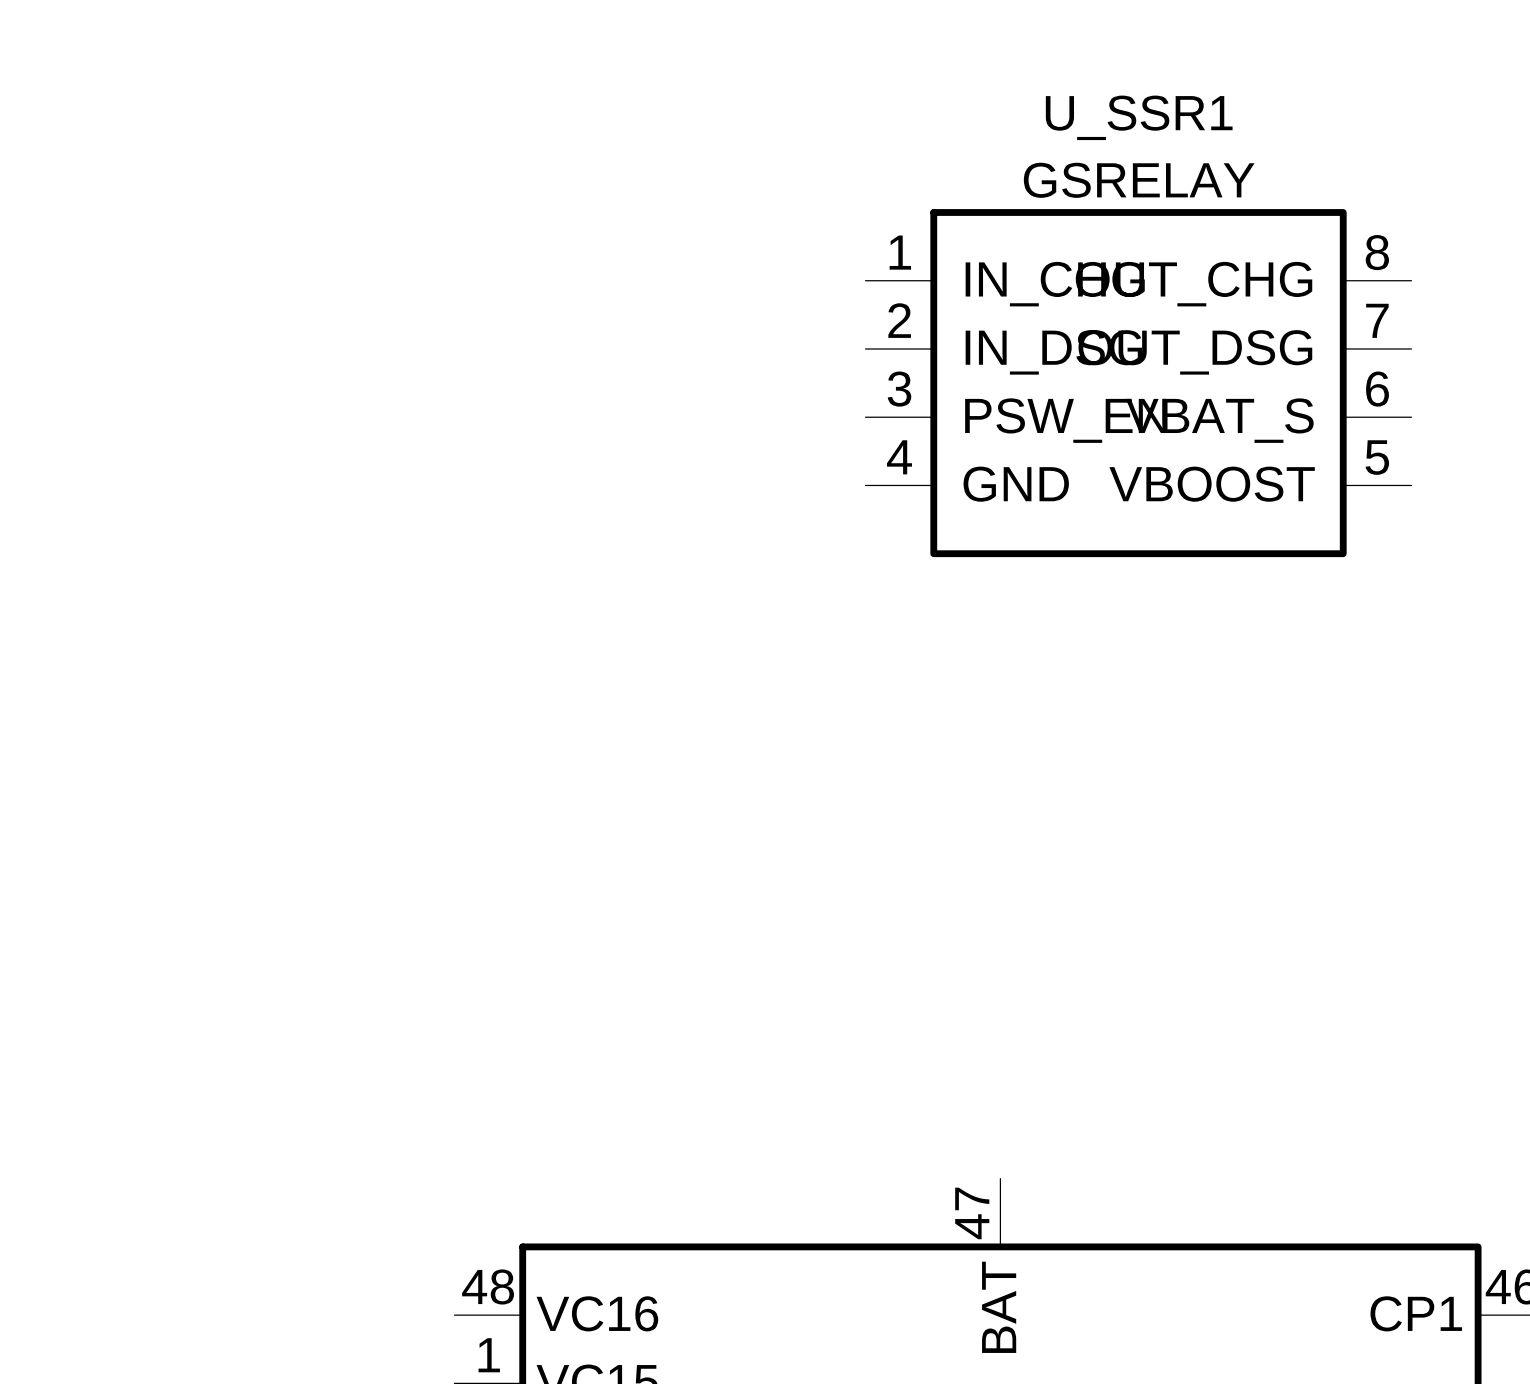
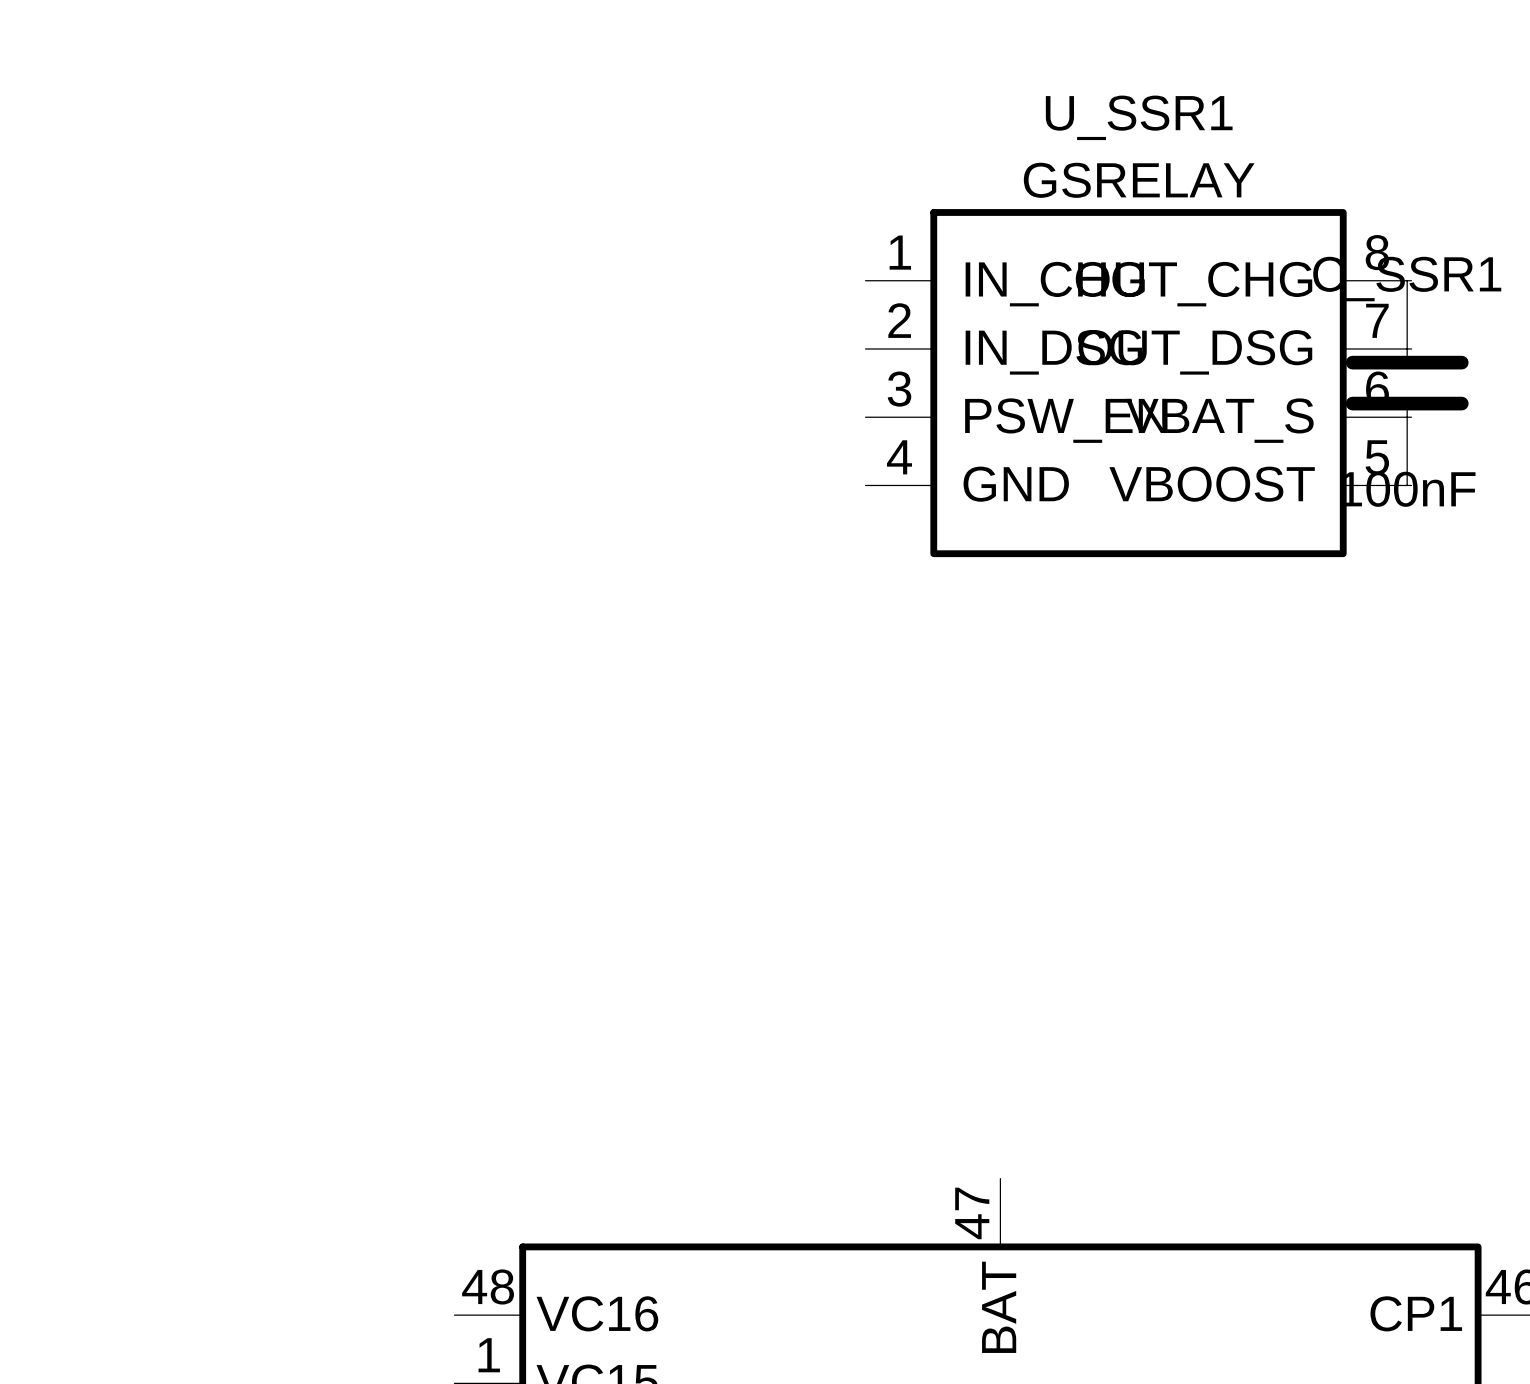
C_SSR1: none -> 100nF (1407, 383)

